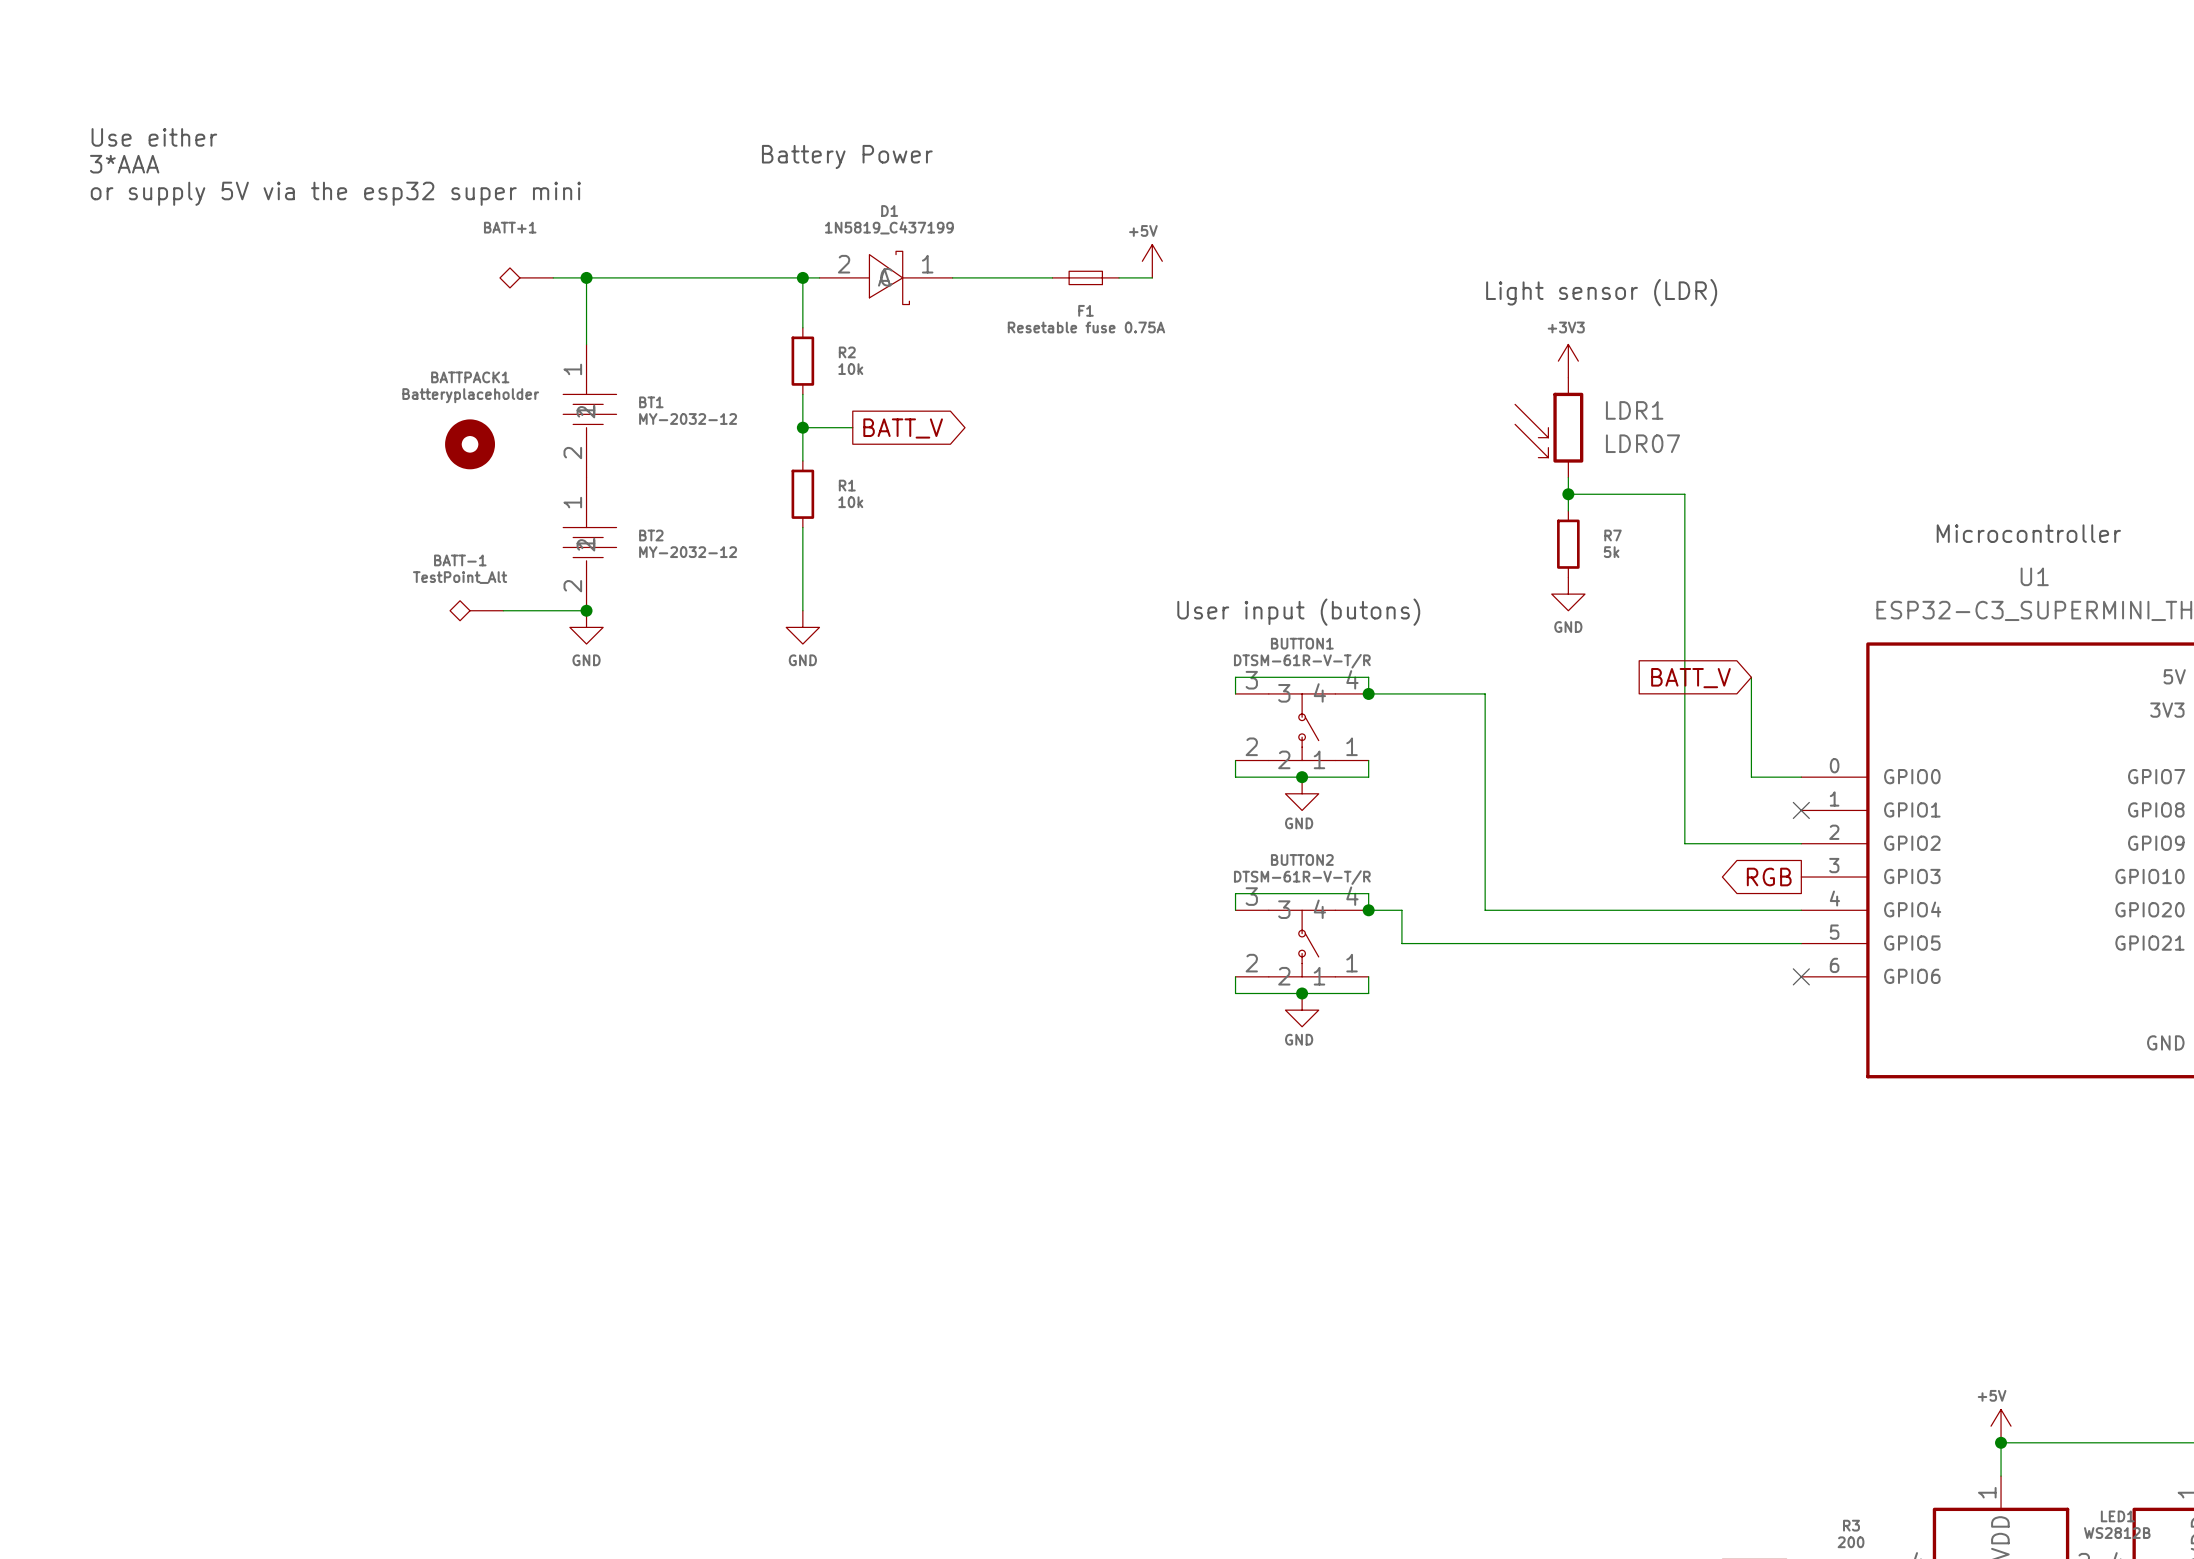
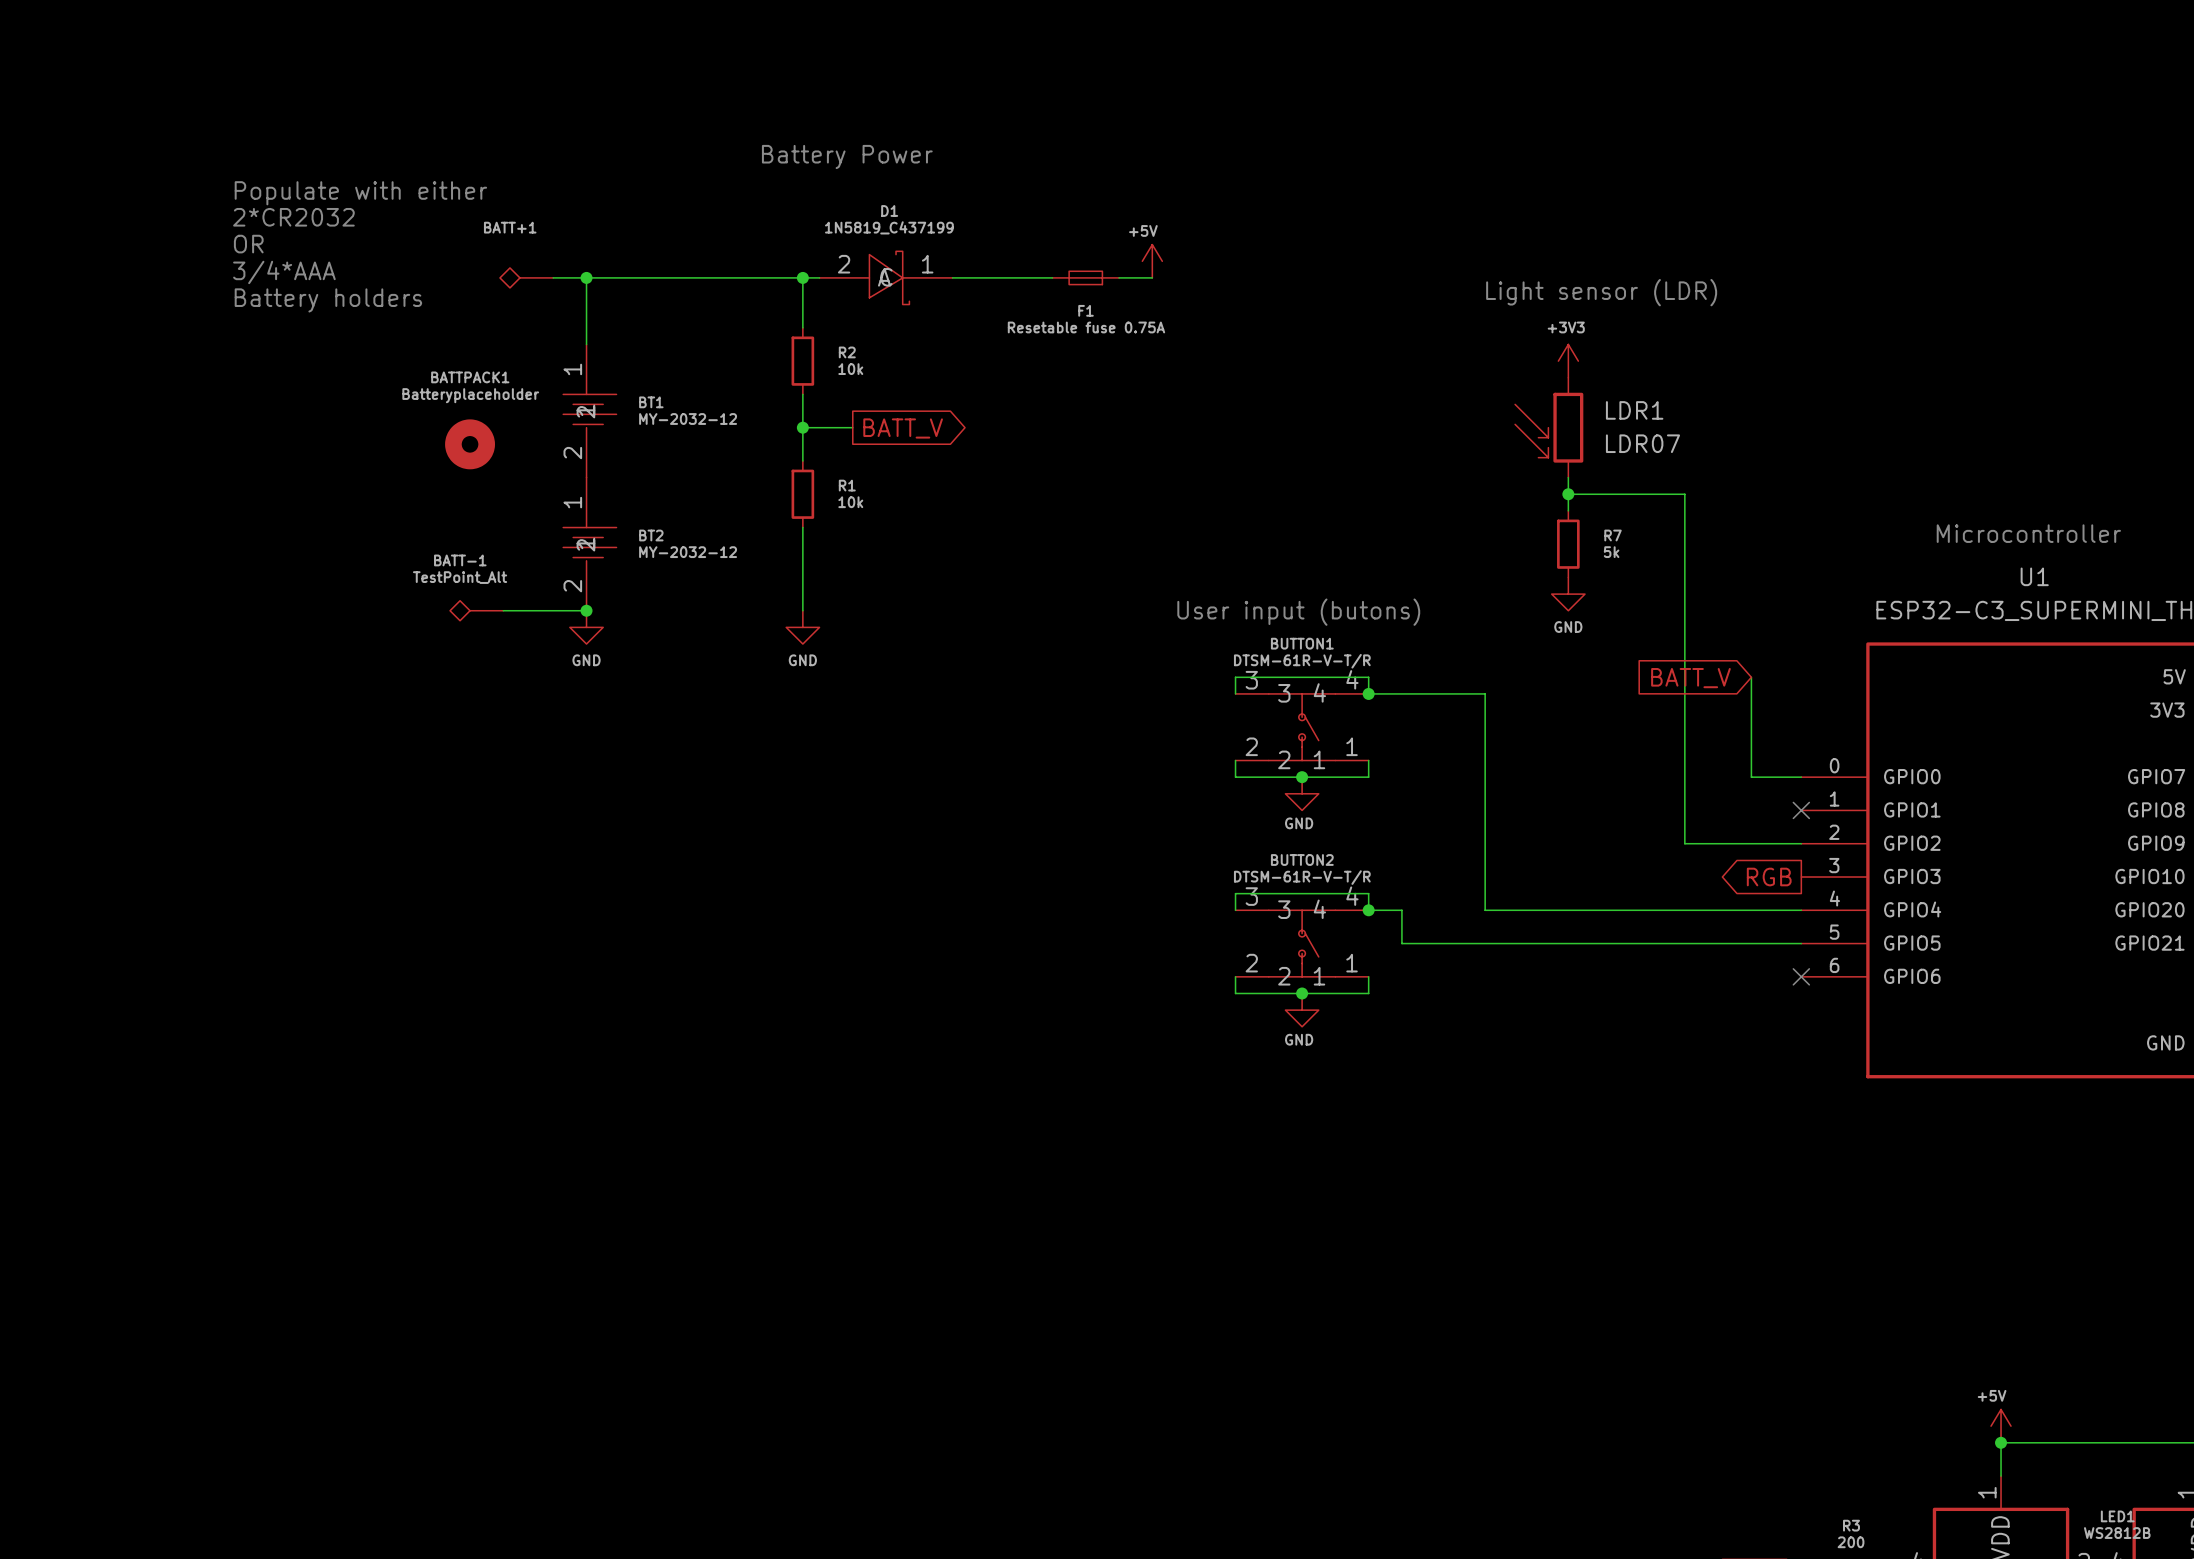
text: Use either (154, 137) -> none
text: 3*AAA (124, 164) -> none
text: or supply 5V via the esp32 super mini (335, 193) -> none
text: none -> Populate with either (360, 193)
text: none -> 2*CR2032 (293, 217)
text: none -> OR (248, 244)
text: none -> 3/4*AAA (284, 272)
text: none -> Battery holders (328, 300)

